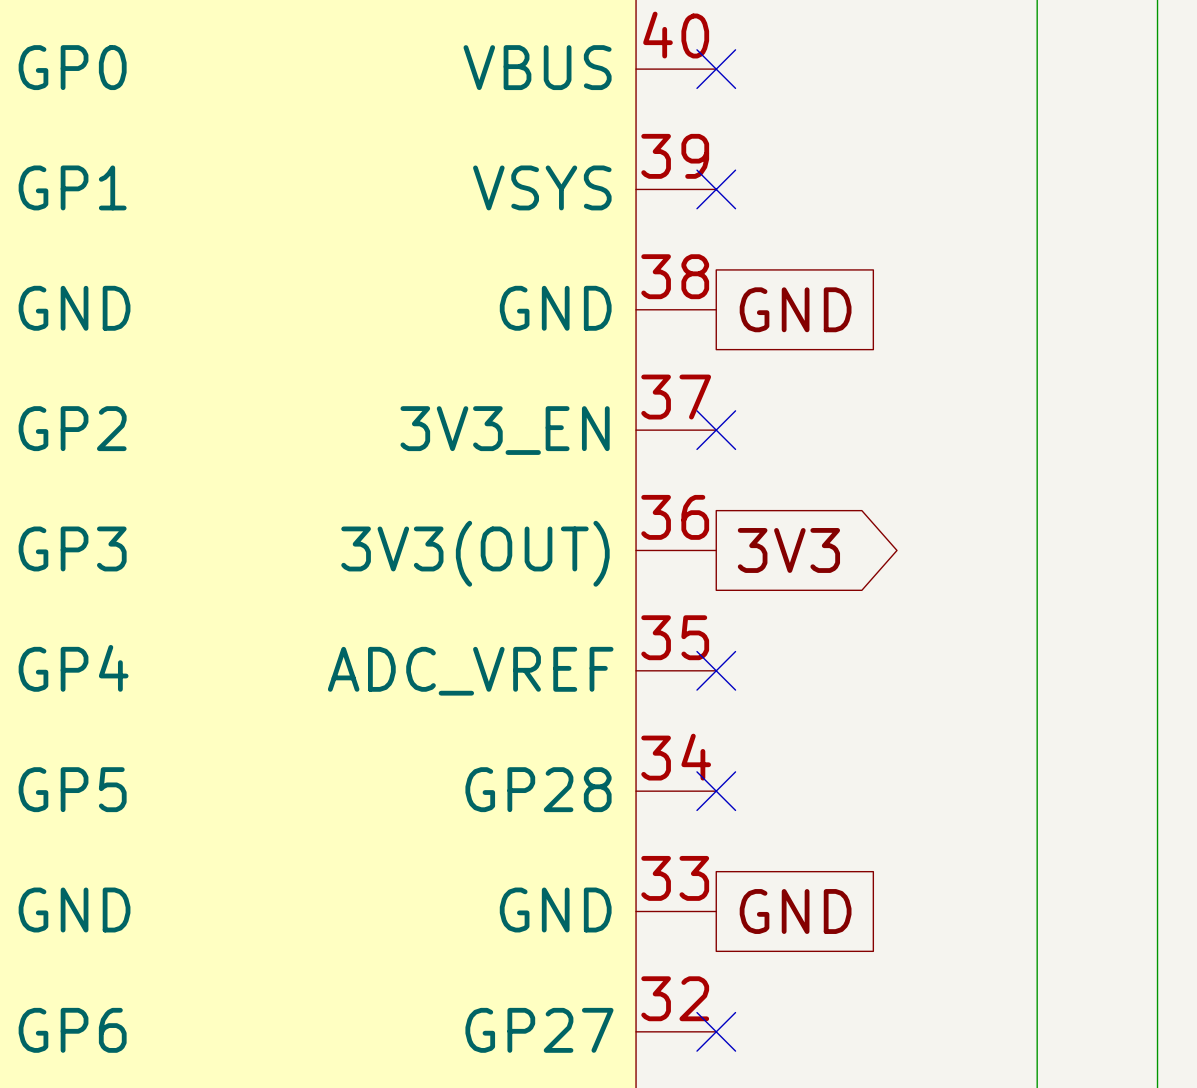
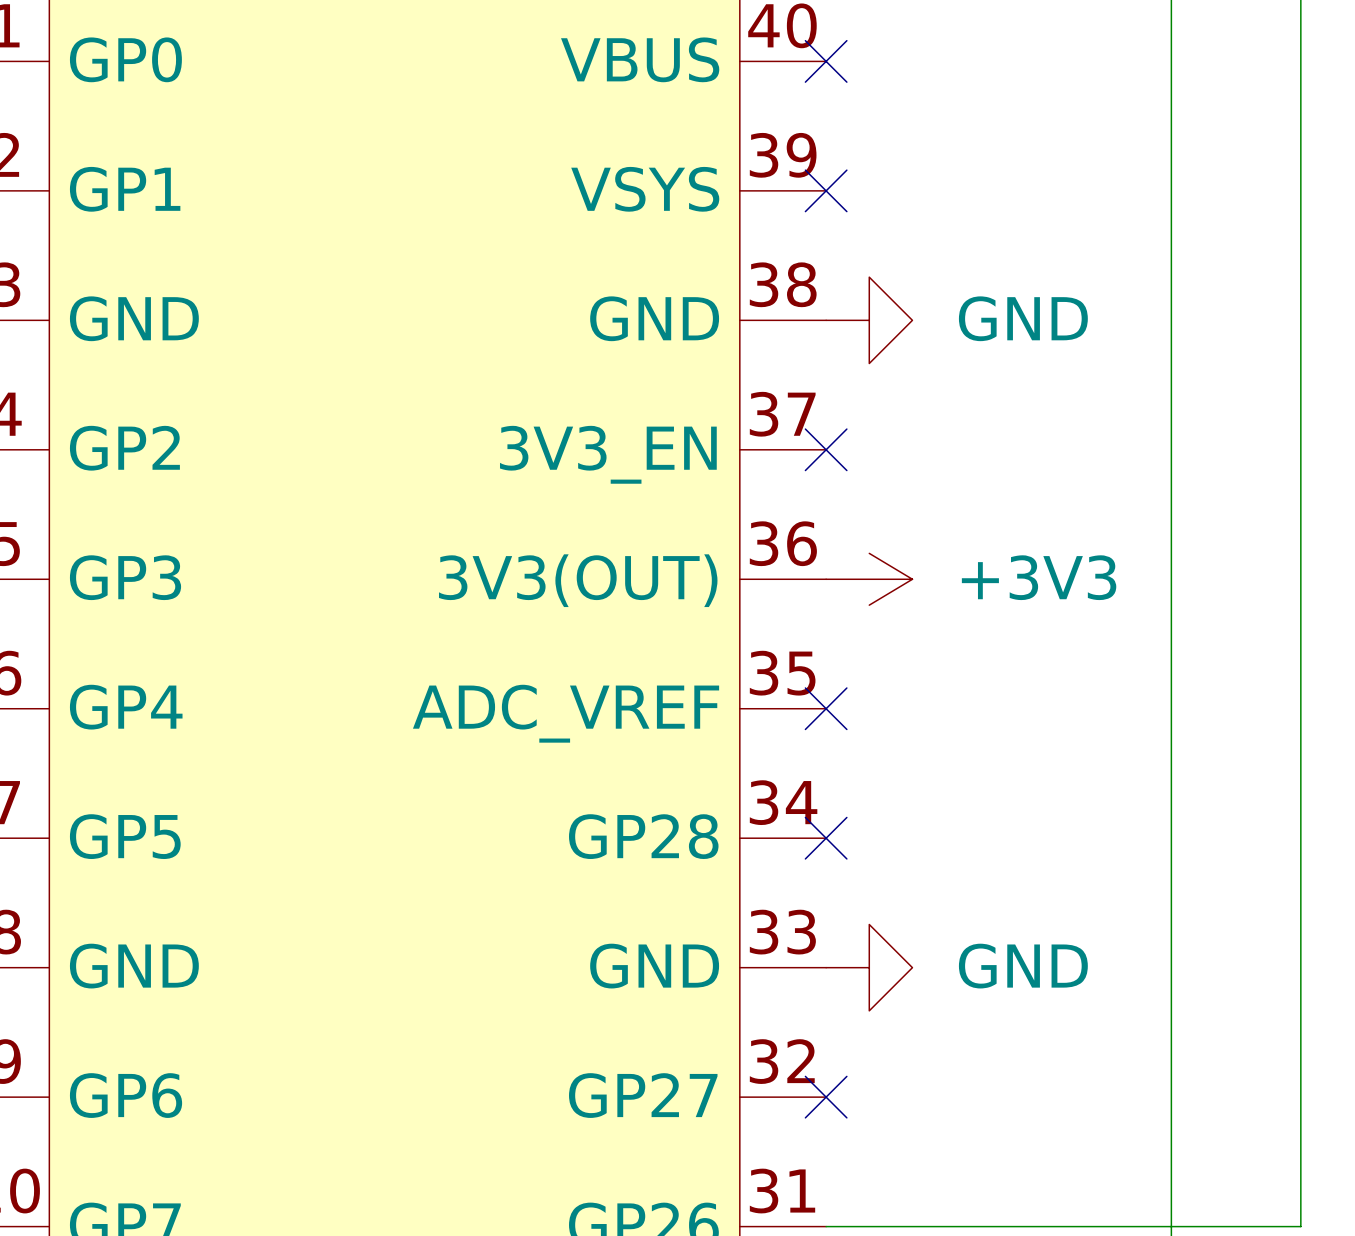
power symbol: none -> GND (869, 320)
global label: GND (795, 309) -> none
power symbol: none -> +3V3 (869, 579)
global label: 3V3 (788, 550) -> none
power symbol: none -> GND (869, 967)
global label: GND (795, 911) -> none

